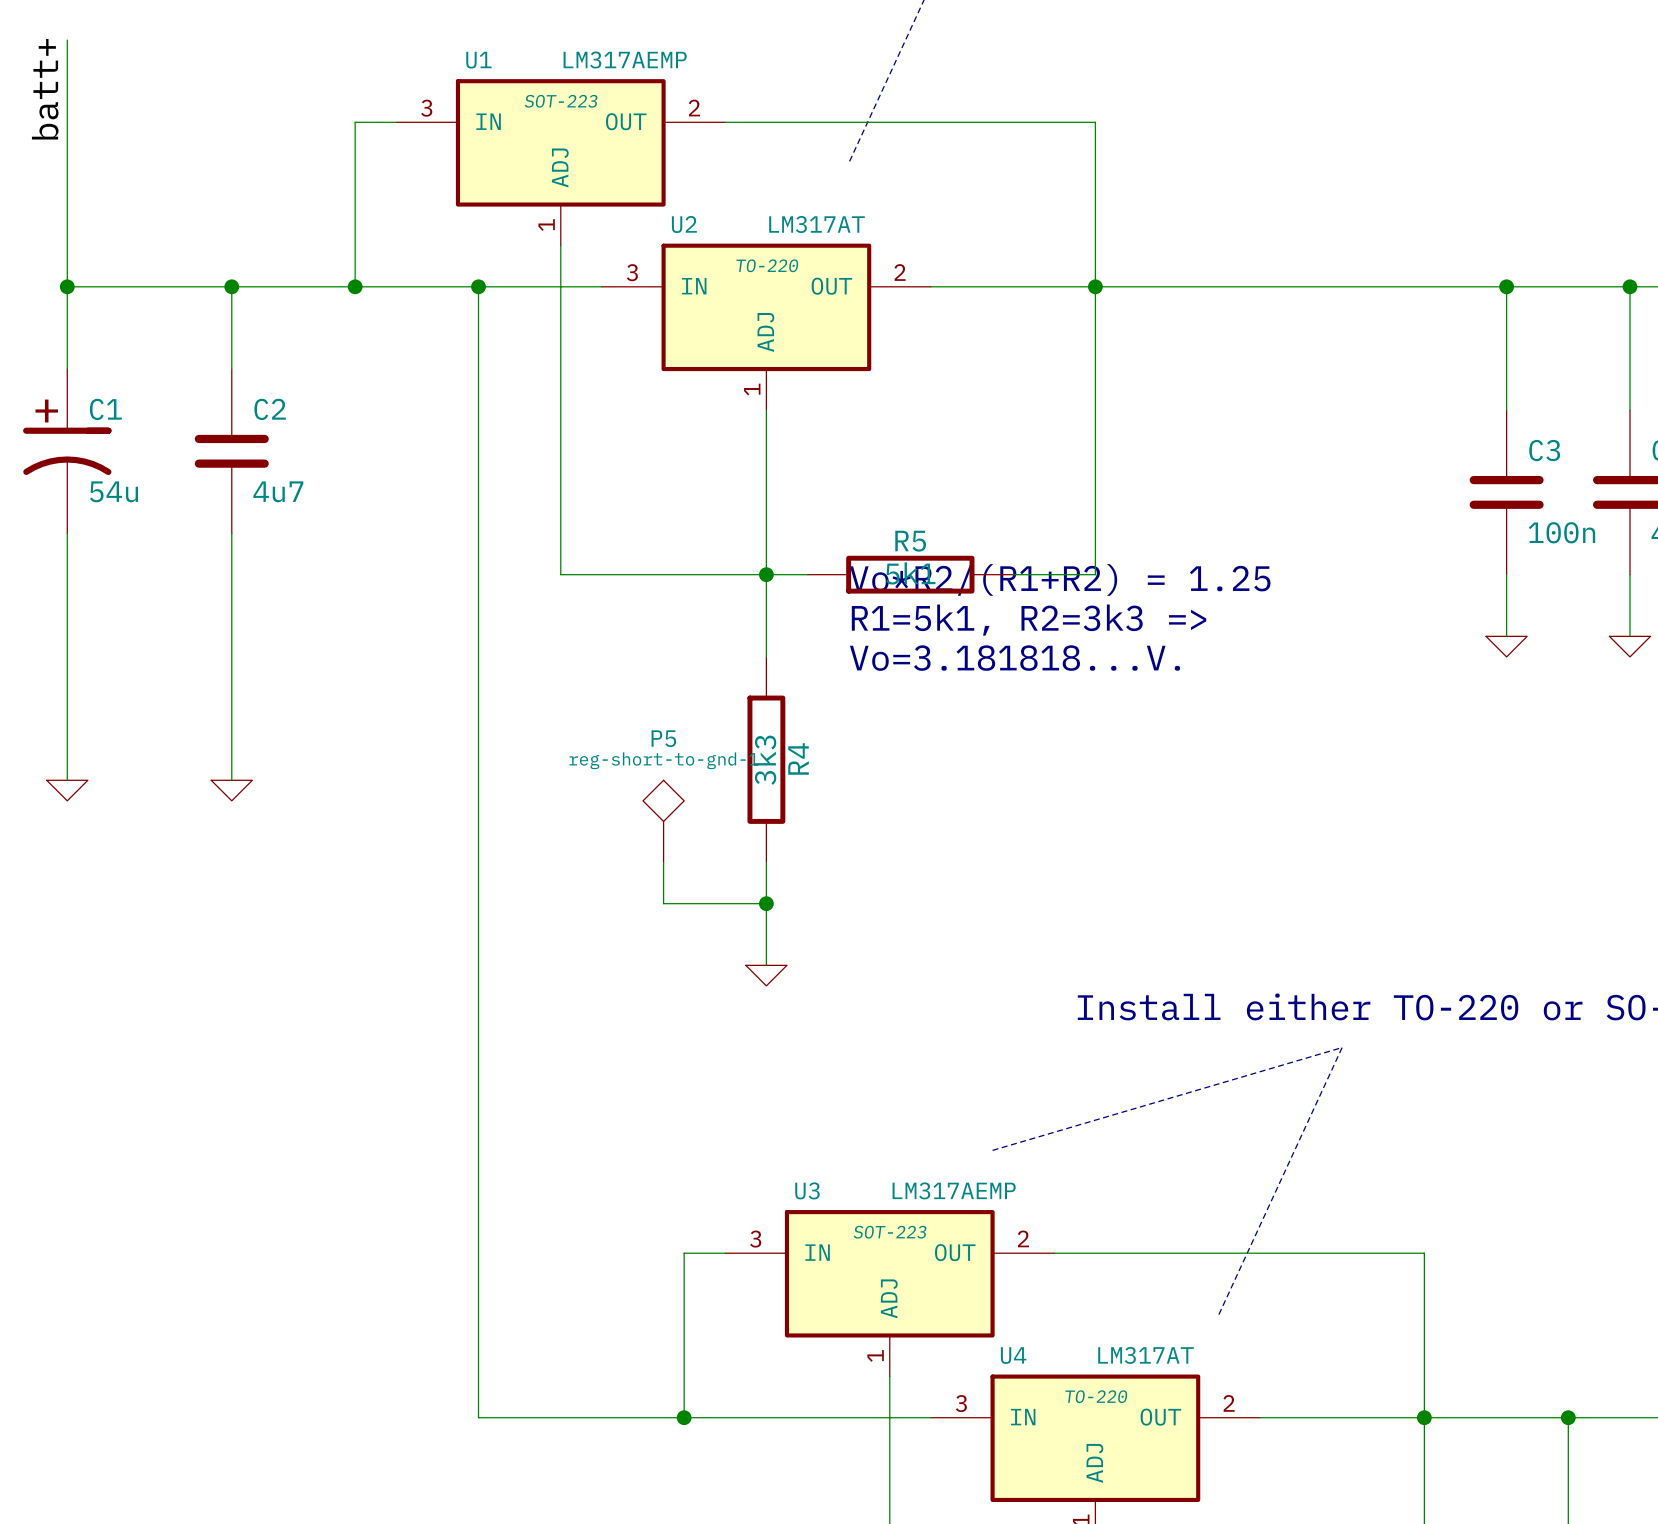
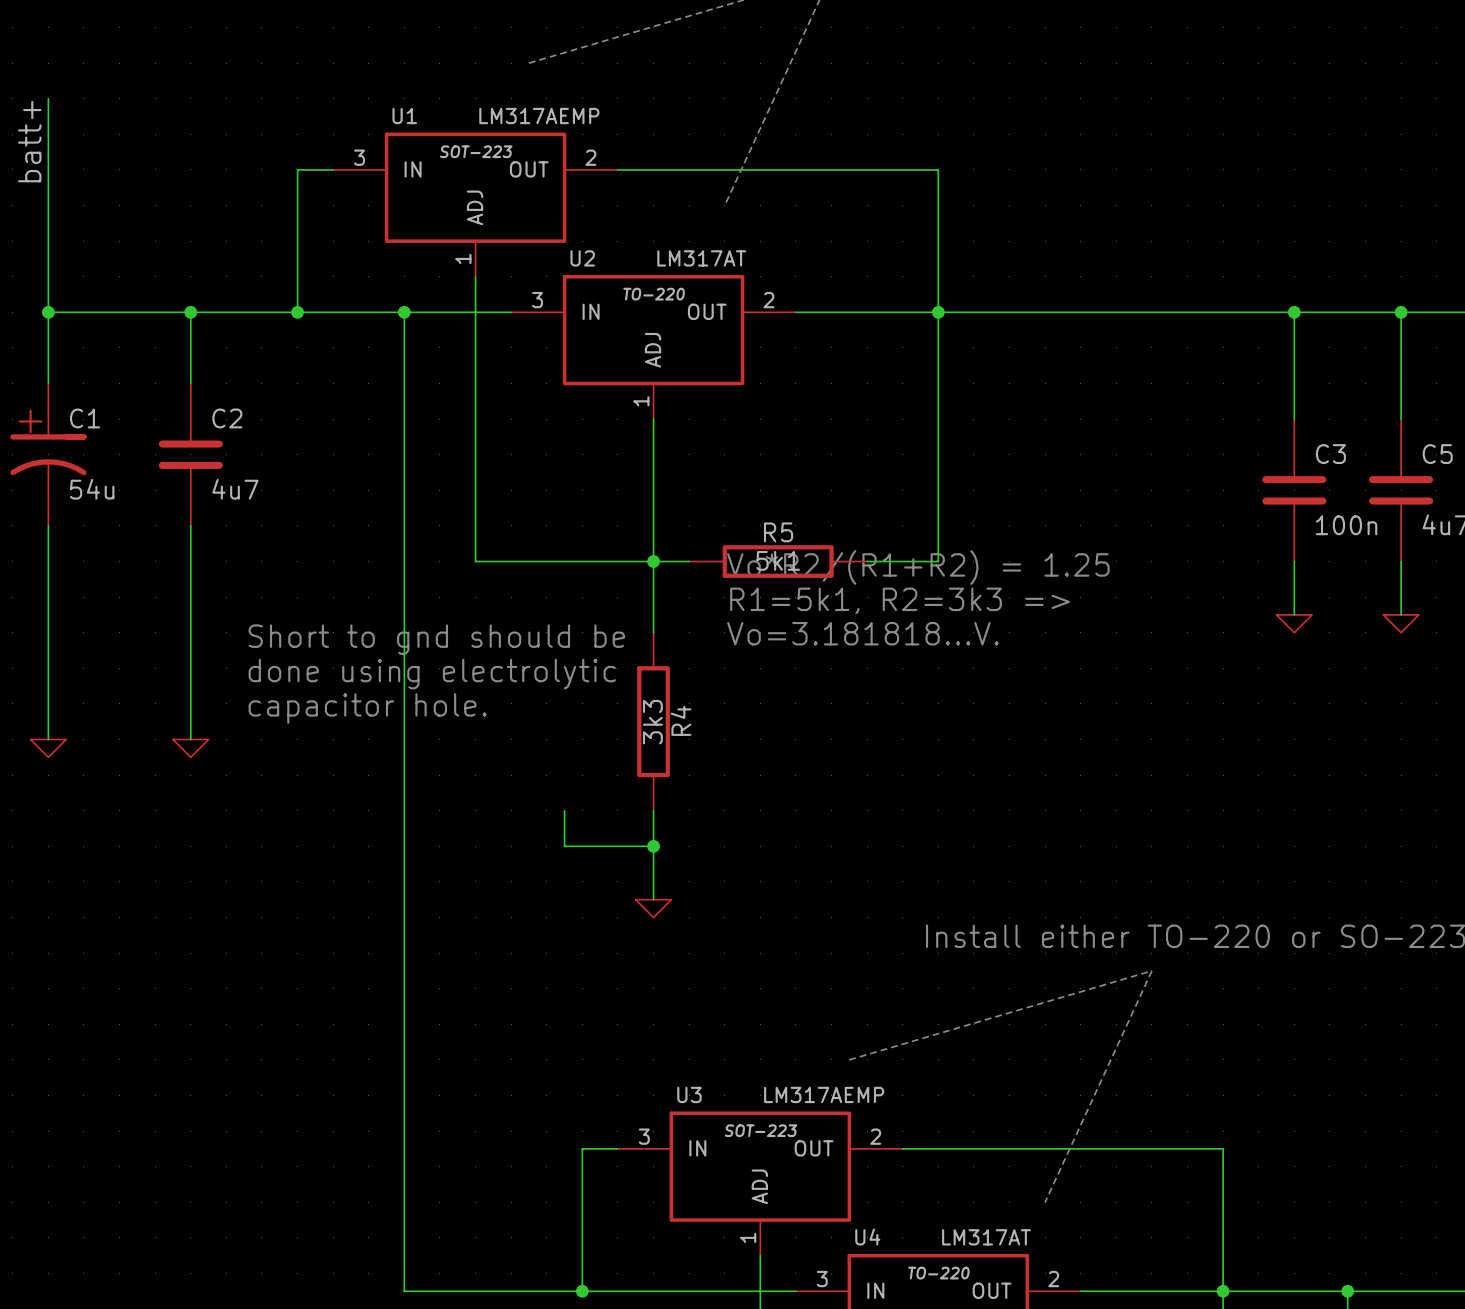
text: none -> Short to gnd should be (436, 639)
text: none -> done using electrolytic (432, 674)
text: none -> capacitor hole. (367, 708)
P5: reg-short-to-gnd-1 (663, 821) -> none

